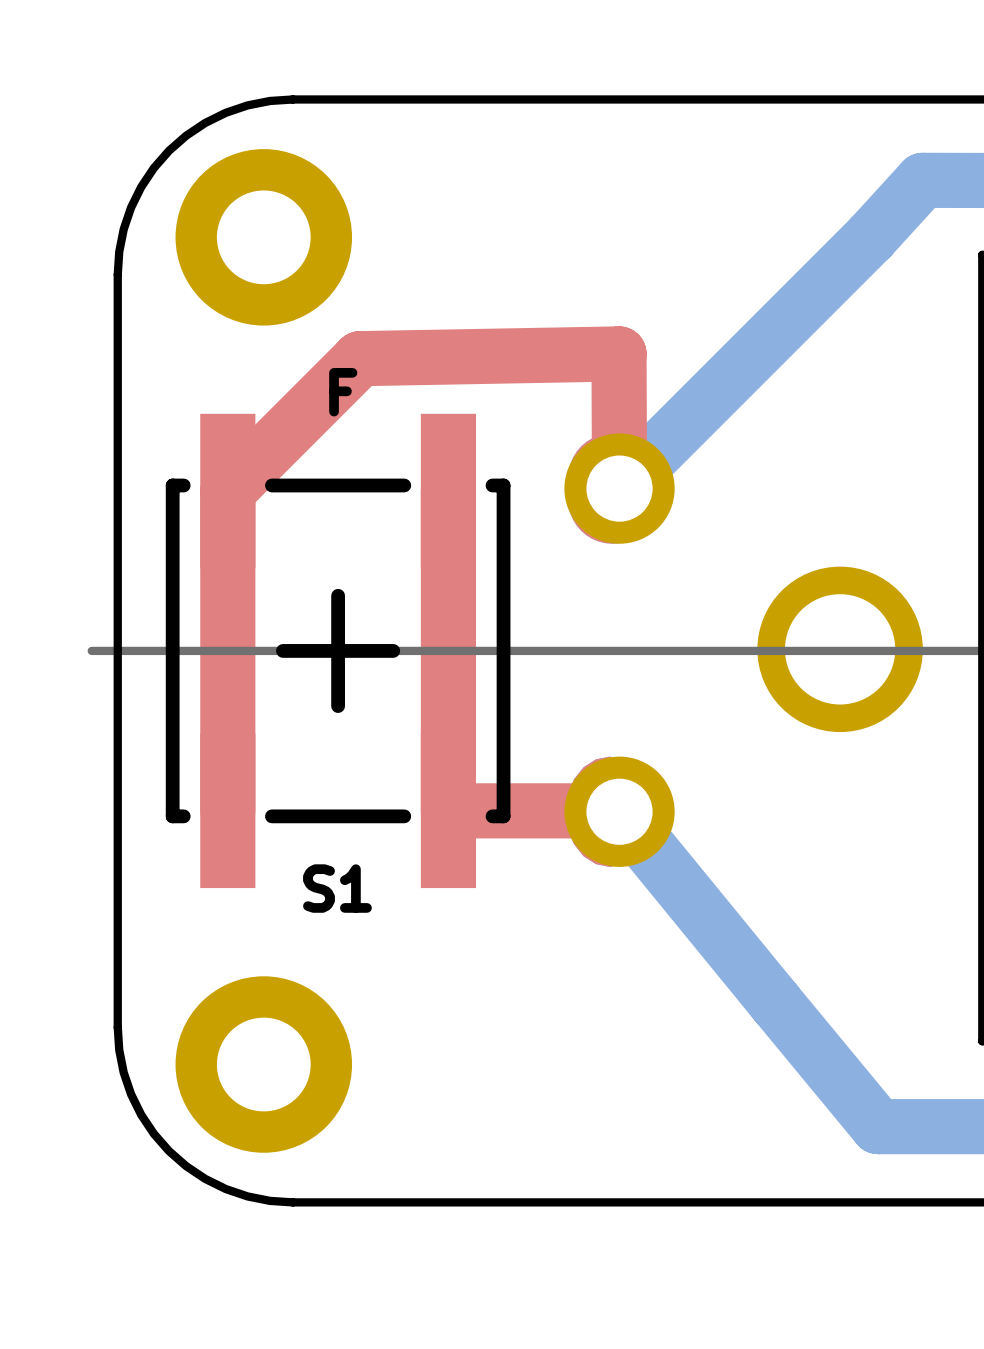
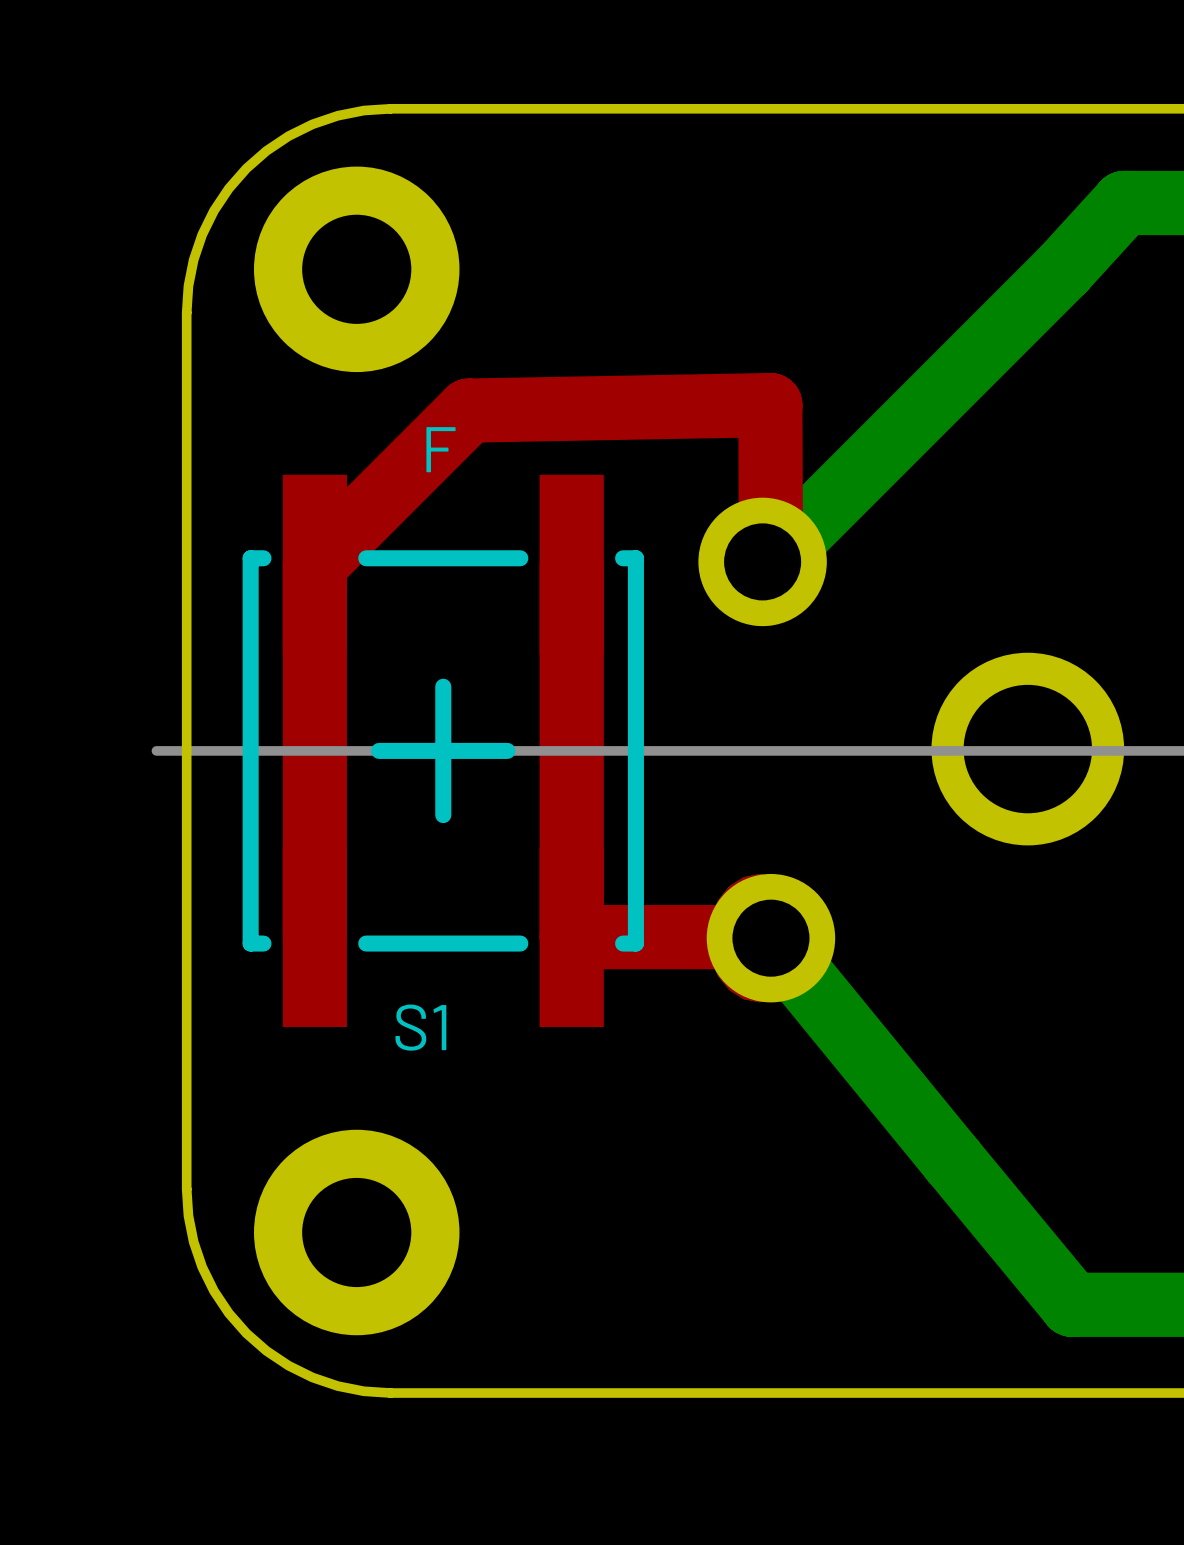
part footprint: [564, 433, 675, 544] -> [698, 497, 827, 627]

